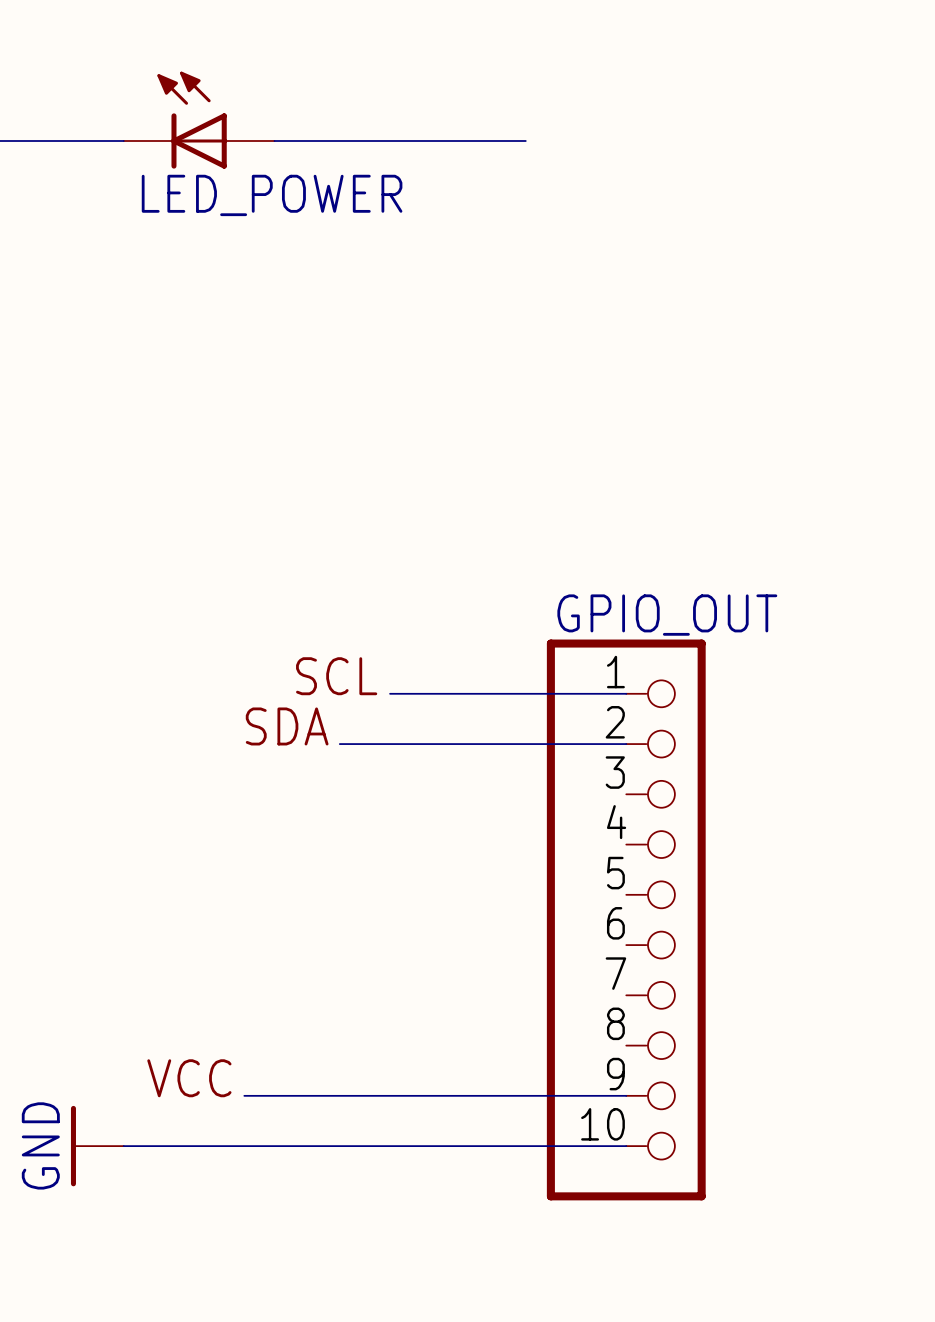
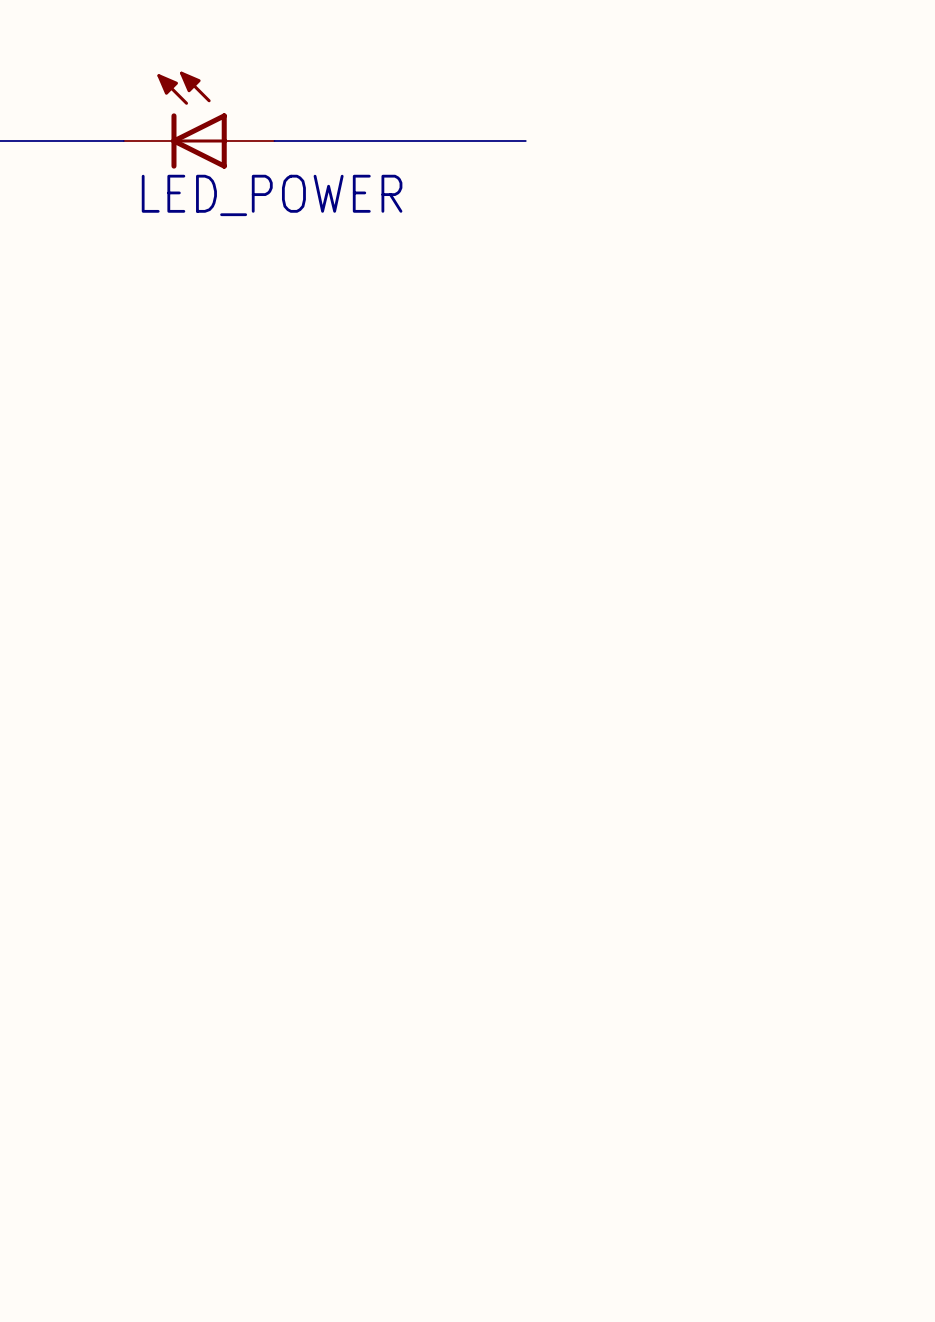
label: SCL (336, 676) -> none
wire: (390, 693) (626, 693) -> none
label: SDA (287, 726) -> none
wire: (339, 744) (626, 744) -> none
GPIO_OUT: (626, 919) -> none
label: VCC (189, 1078) -> none
wire: (244, 1095) (626, 1095) -> none
power symbol: GND (97, 1146) -> none
wire: (123, 1146) (626, 1146) -> none

